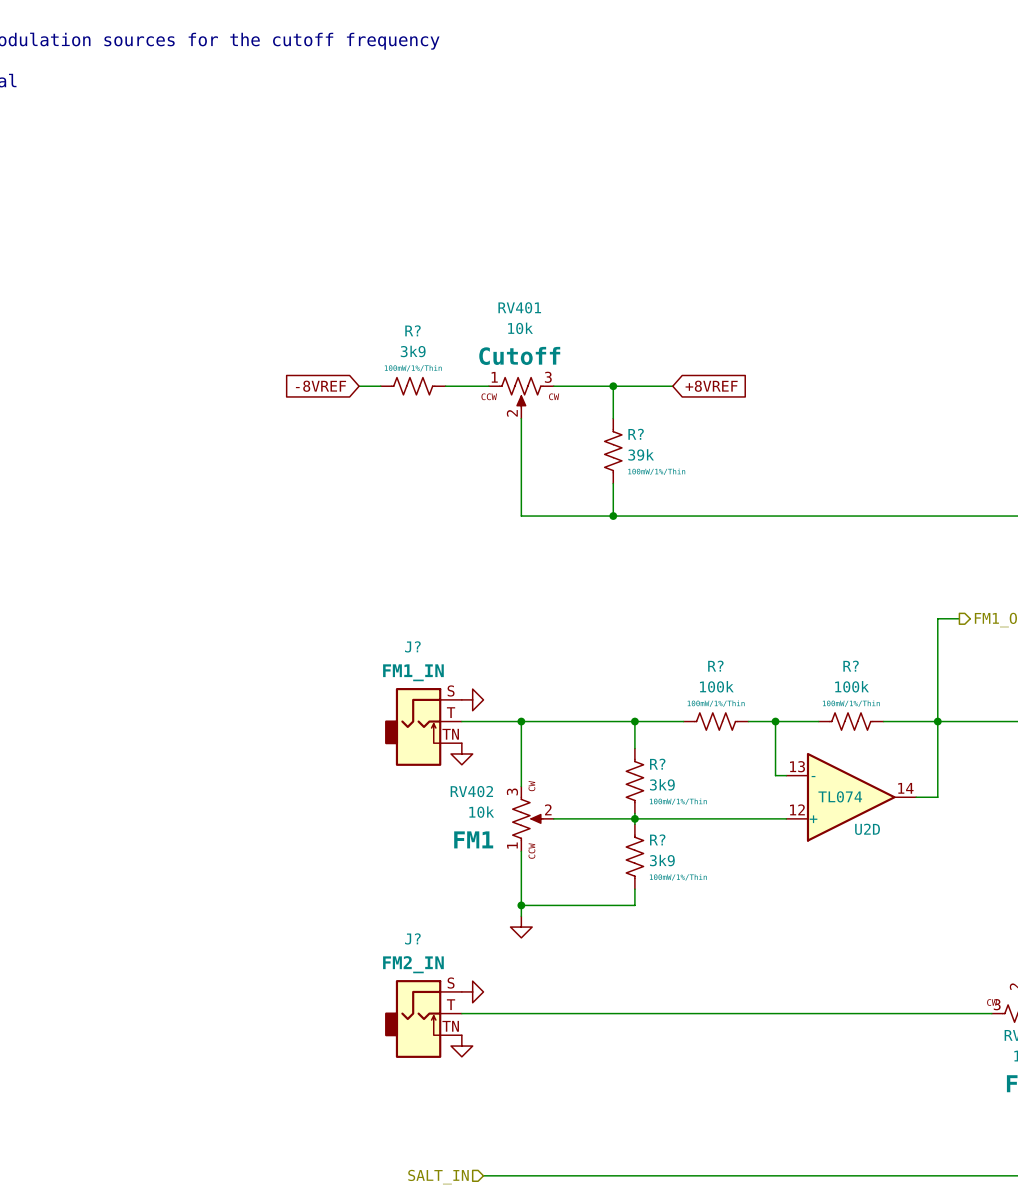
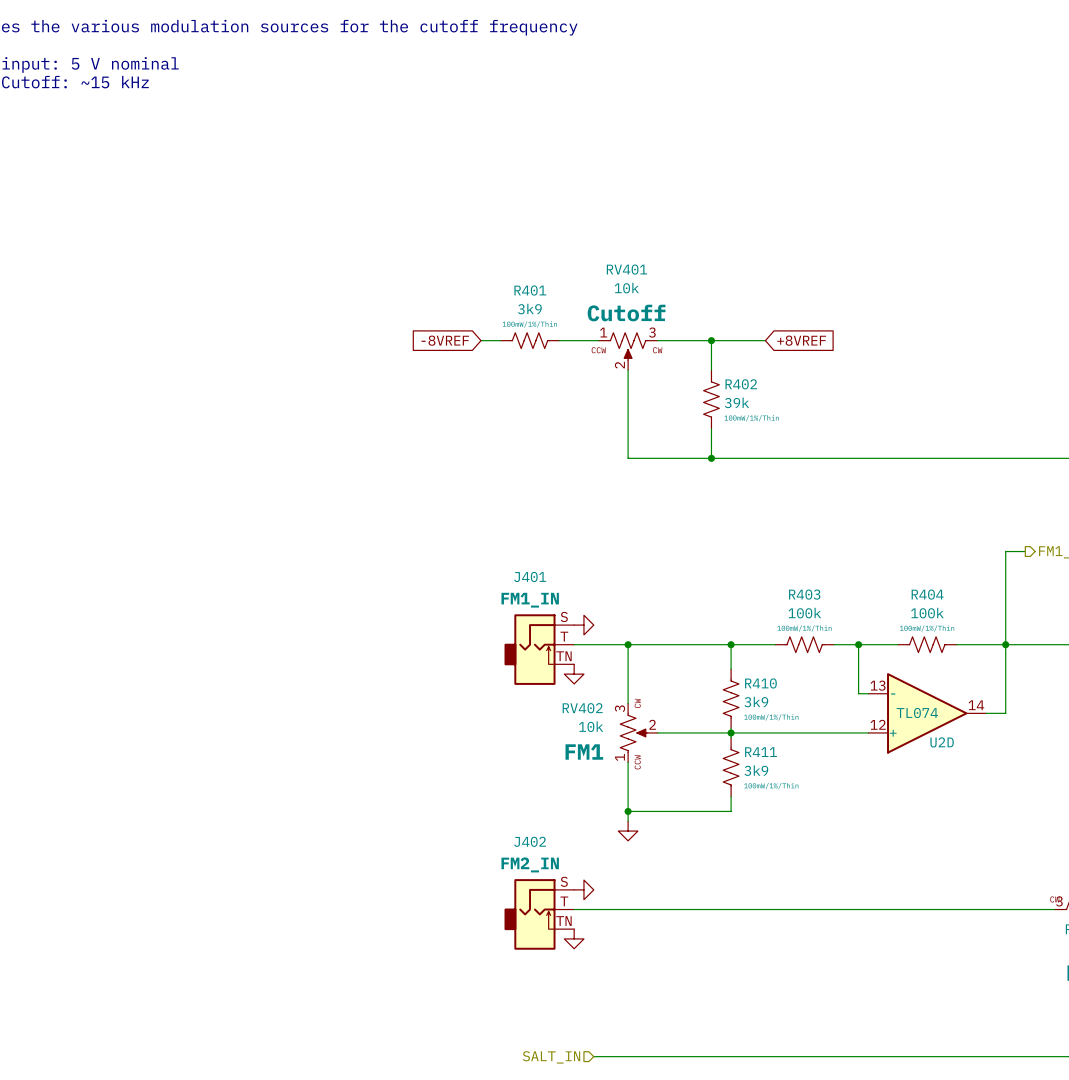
R? name: R? (413, 330) -> R401 (530, 290)
R? name: R? (636, 434) -> R402 (741, 384)
J? name: J? (412, 646) -> J401 (530, 577)
R? name: R? (715, 666) -> R403 (804, 594)
R? name: R? (851, 666) -> R404 (927, 594)
R? name: R? (657, 764) -> R410 (760, 683)
R? name: R? (657, 839) -> R411 (761, 752)
J? name: J? (412, 938) -> J402 (530, 841)

